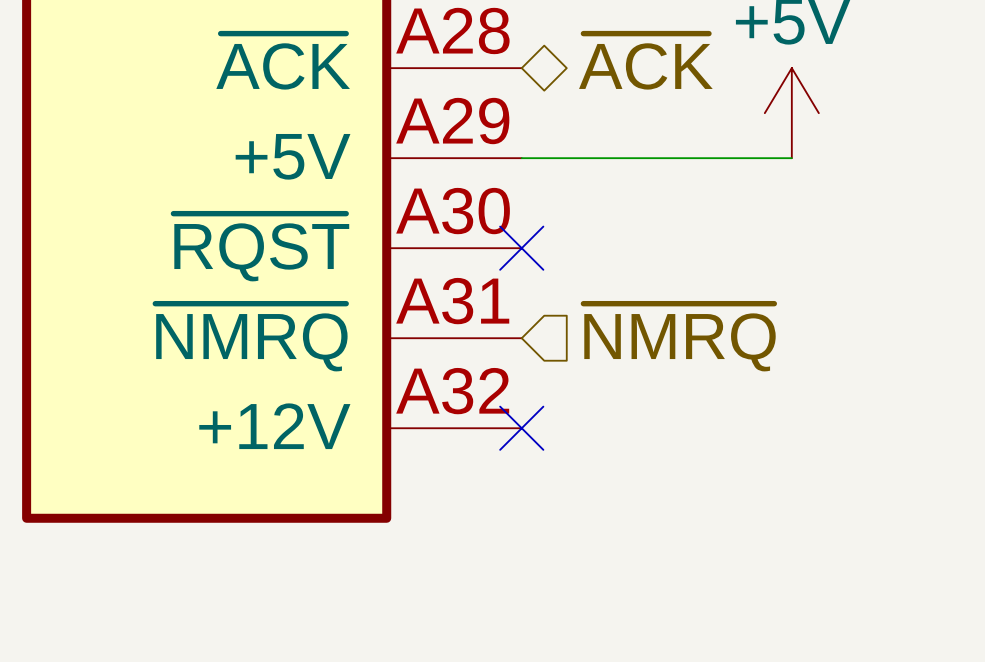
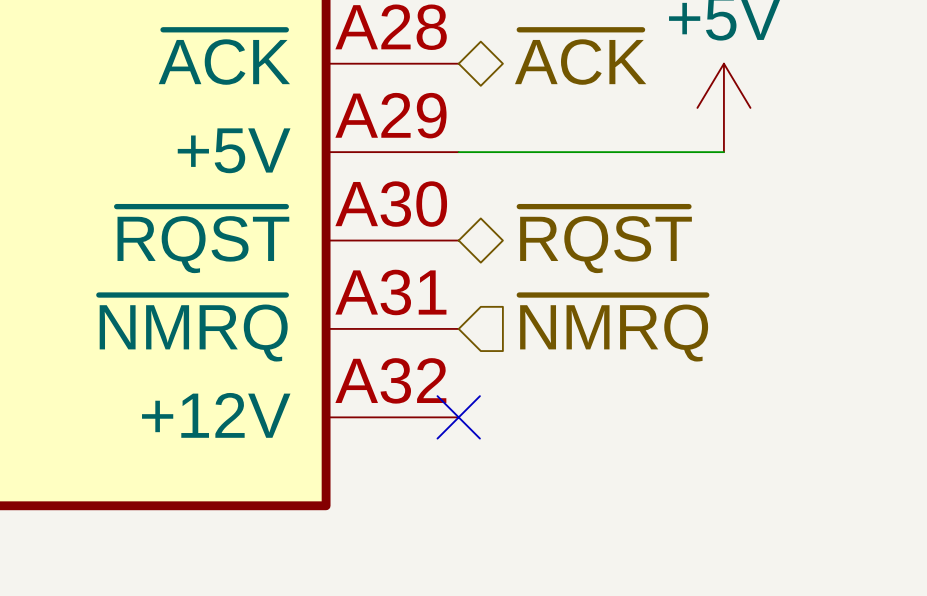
hierarchical label: none -> ~{RQST} (605, 239)
no-connect mark: (521, 248) -> none

